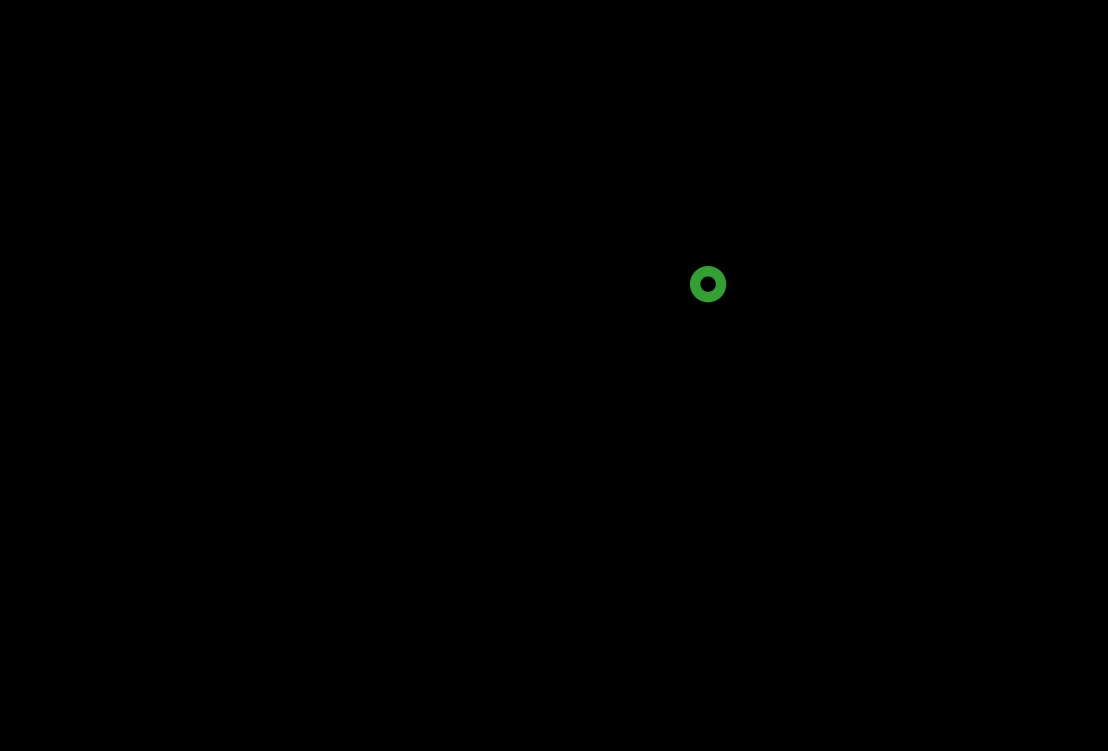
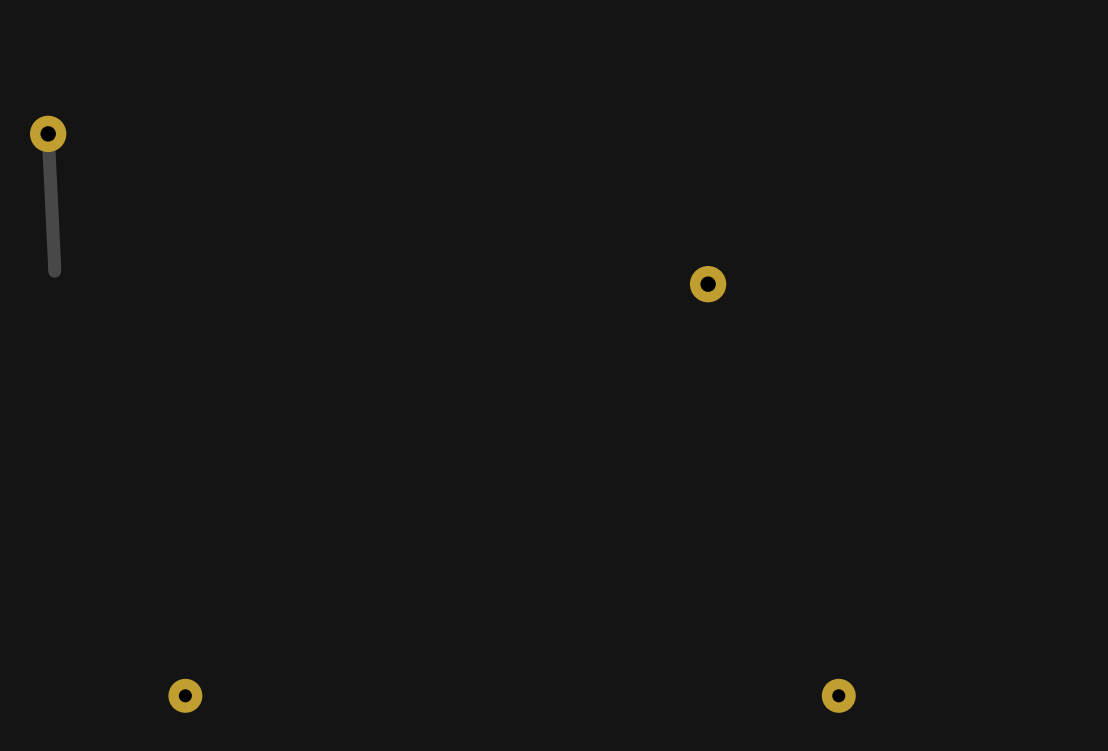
track: none -> (48, 133) (54, 271)
via: none -> (48, 133)
via: none -> (185, 695)
via: none -> (838, 695)

